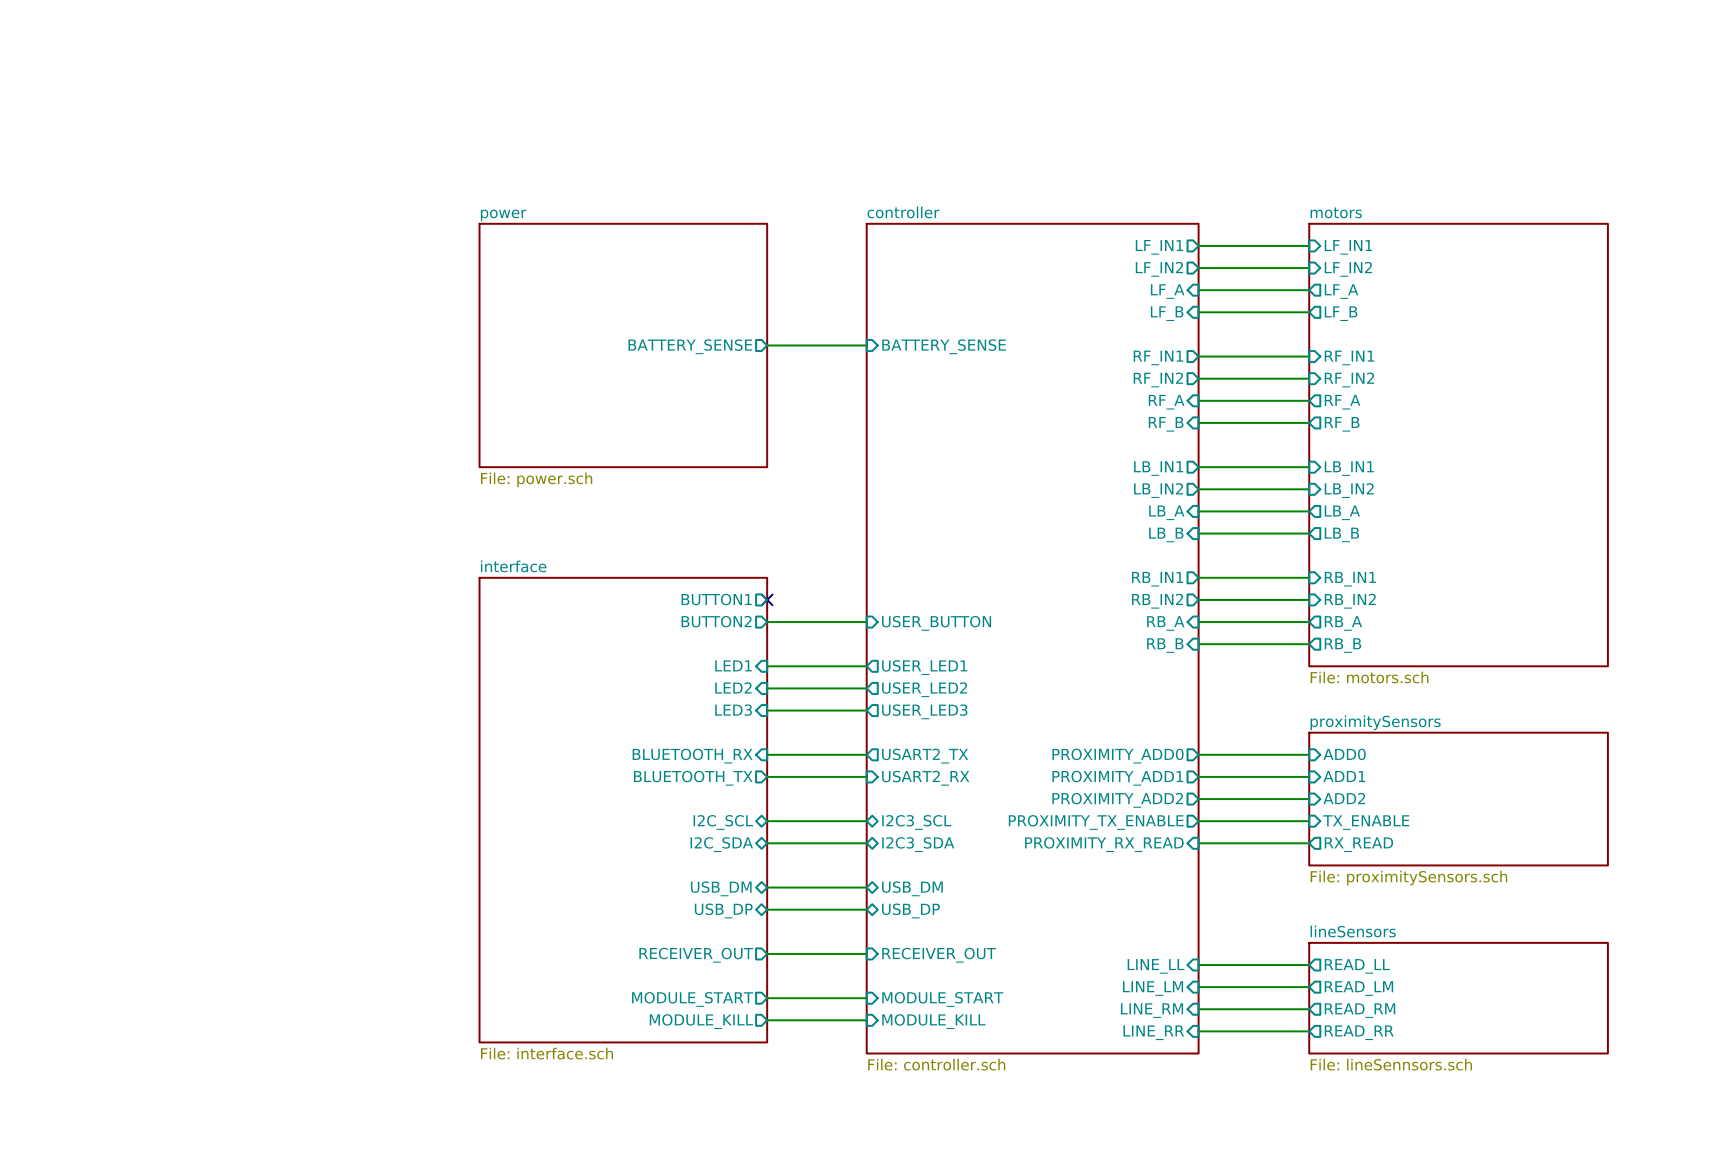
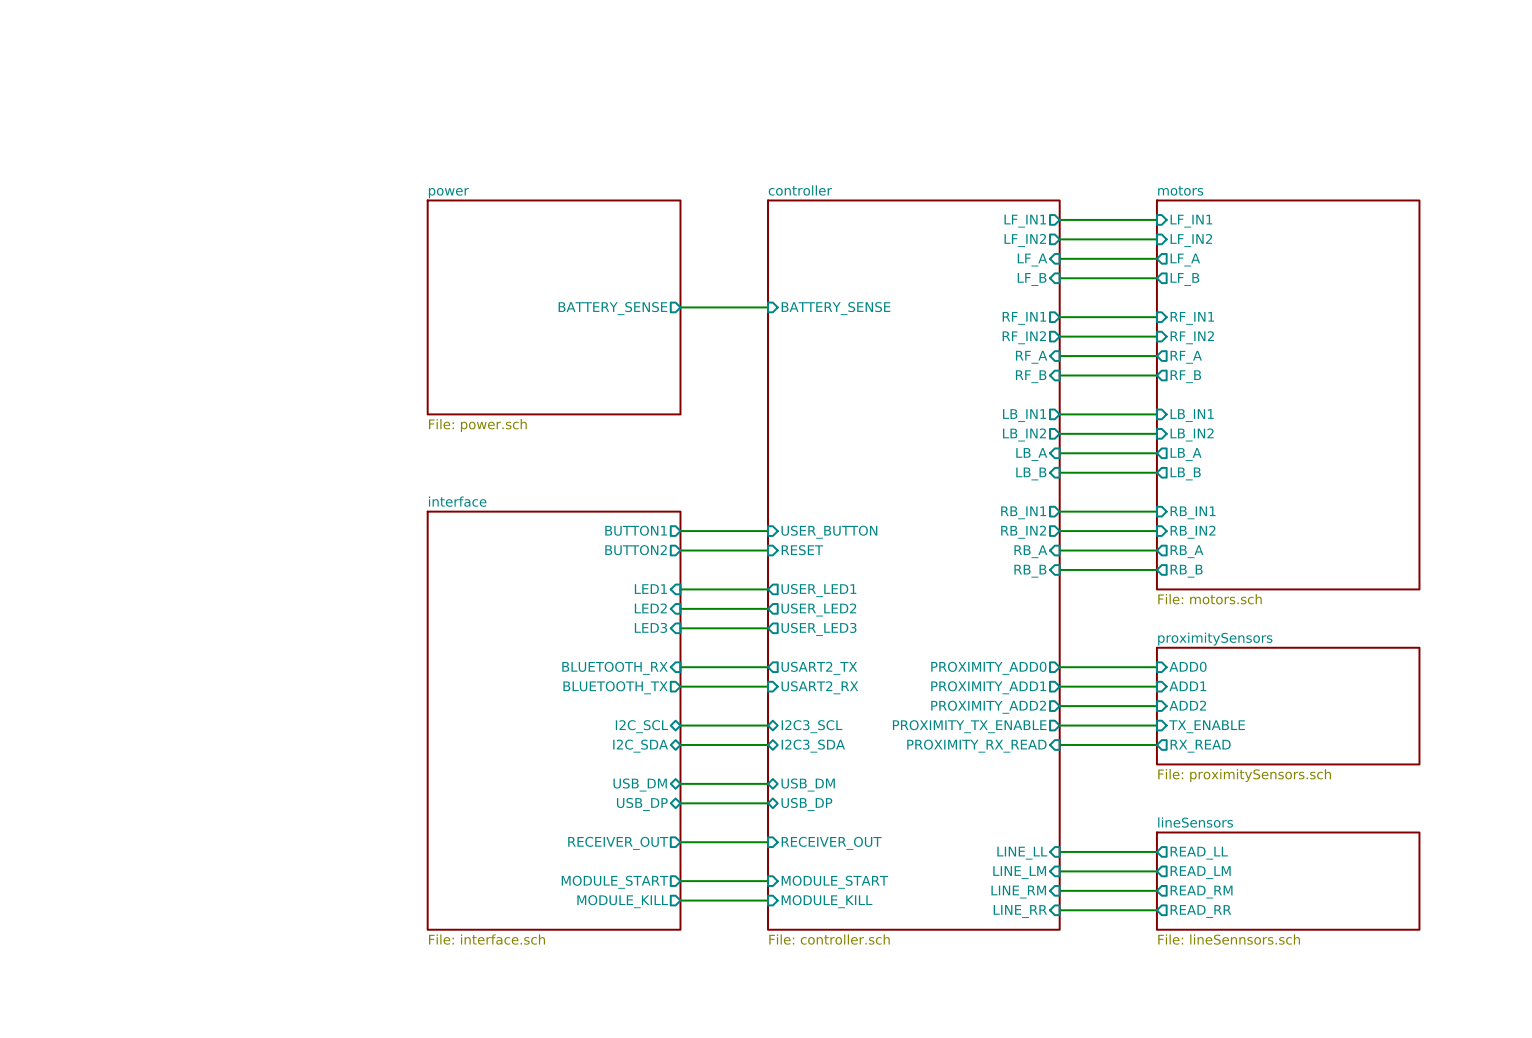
sheet interface shape: [479, 577, 768, 1043] -> [427, 511, 681, 930]
wire: none -> (680, 531) (768, 531)
no-connect mark: (767, 599) -> none
sheet pin: none -> USER_BUTTON (829, 532)
sheet pin: USER_BUTTON (936, 623) -> RESET (802, 550)

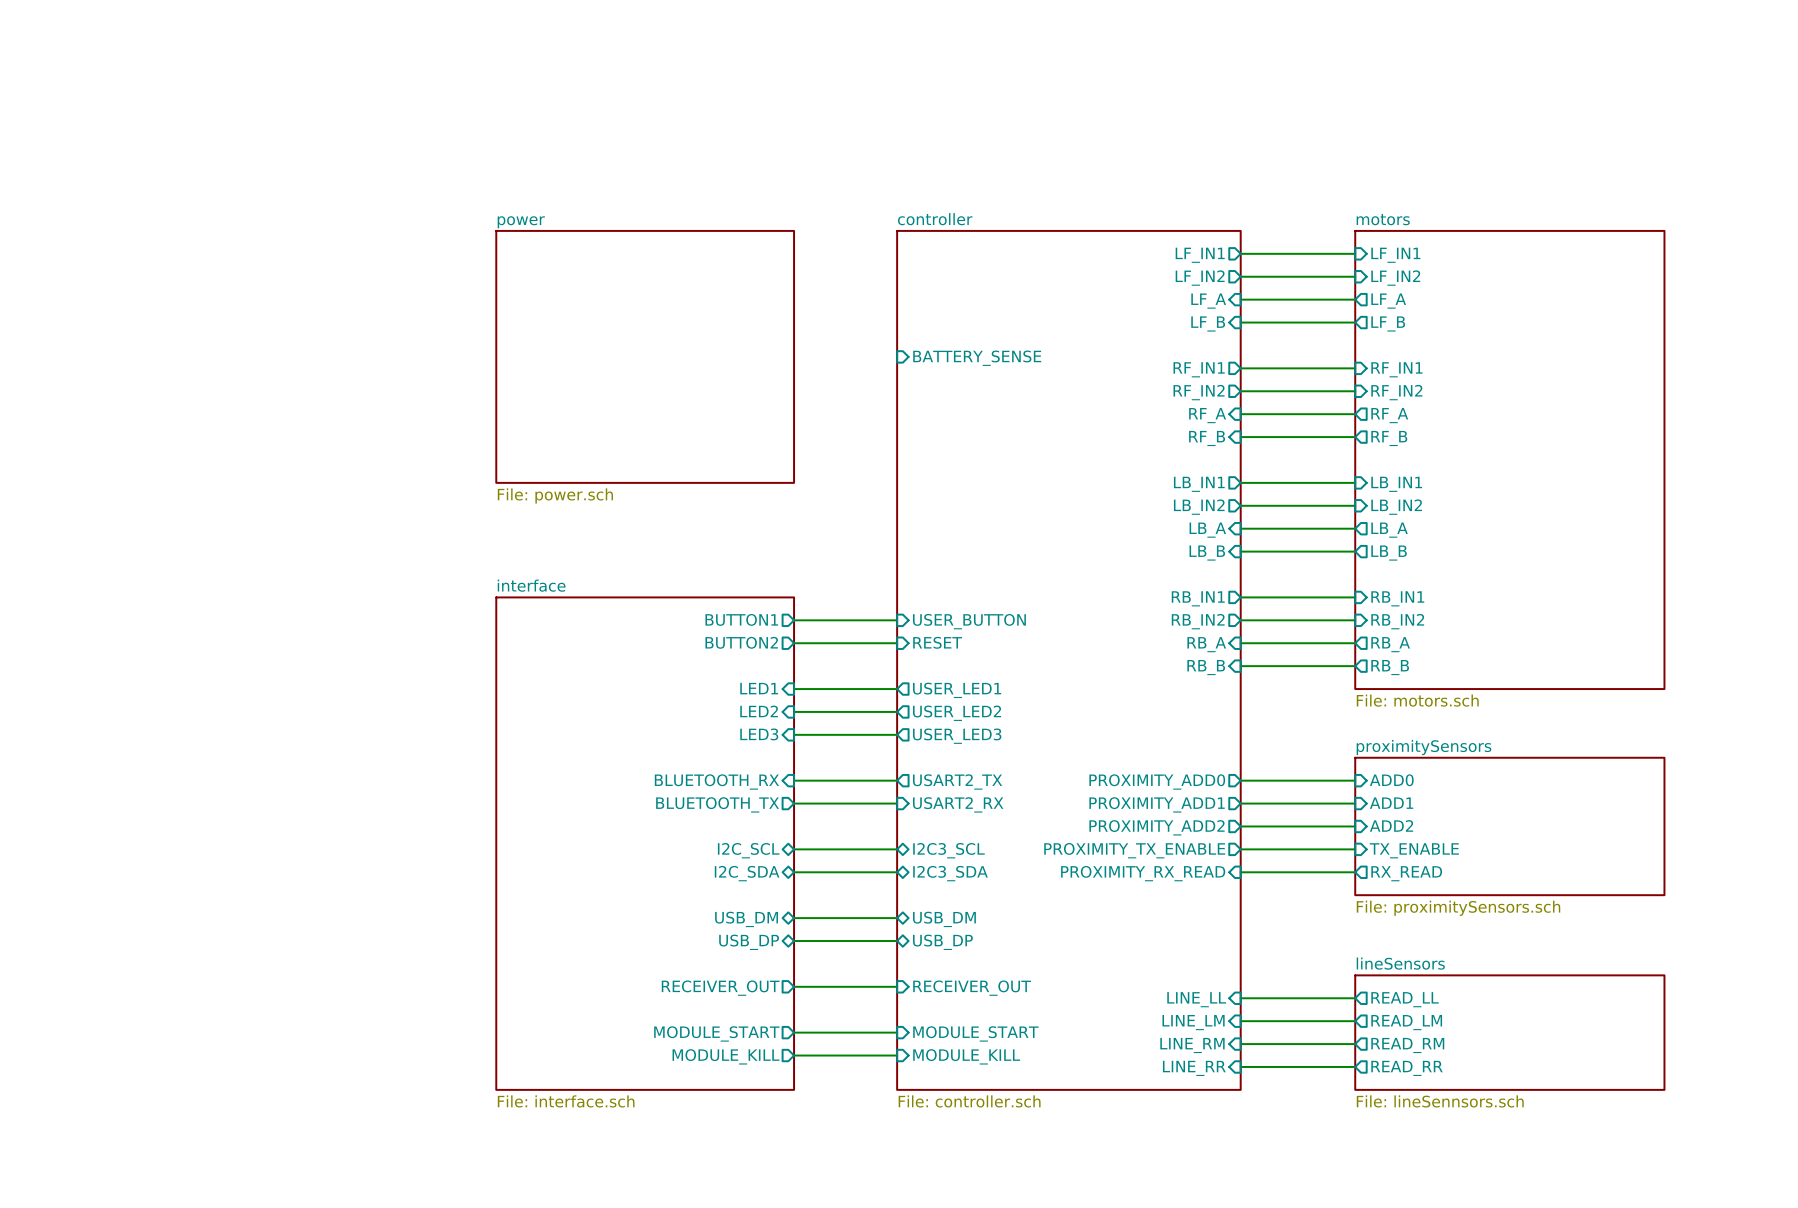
wire: (680, 307) (768, 307) -> none
sheet pin: BATTERY_SENSE (612, 308) -> none

